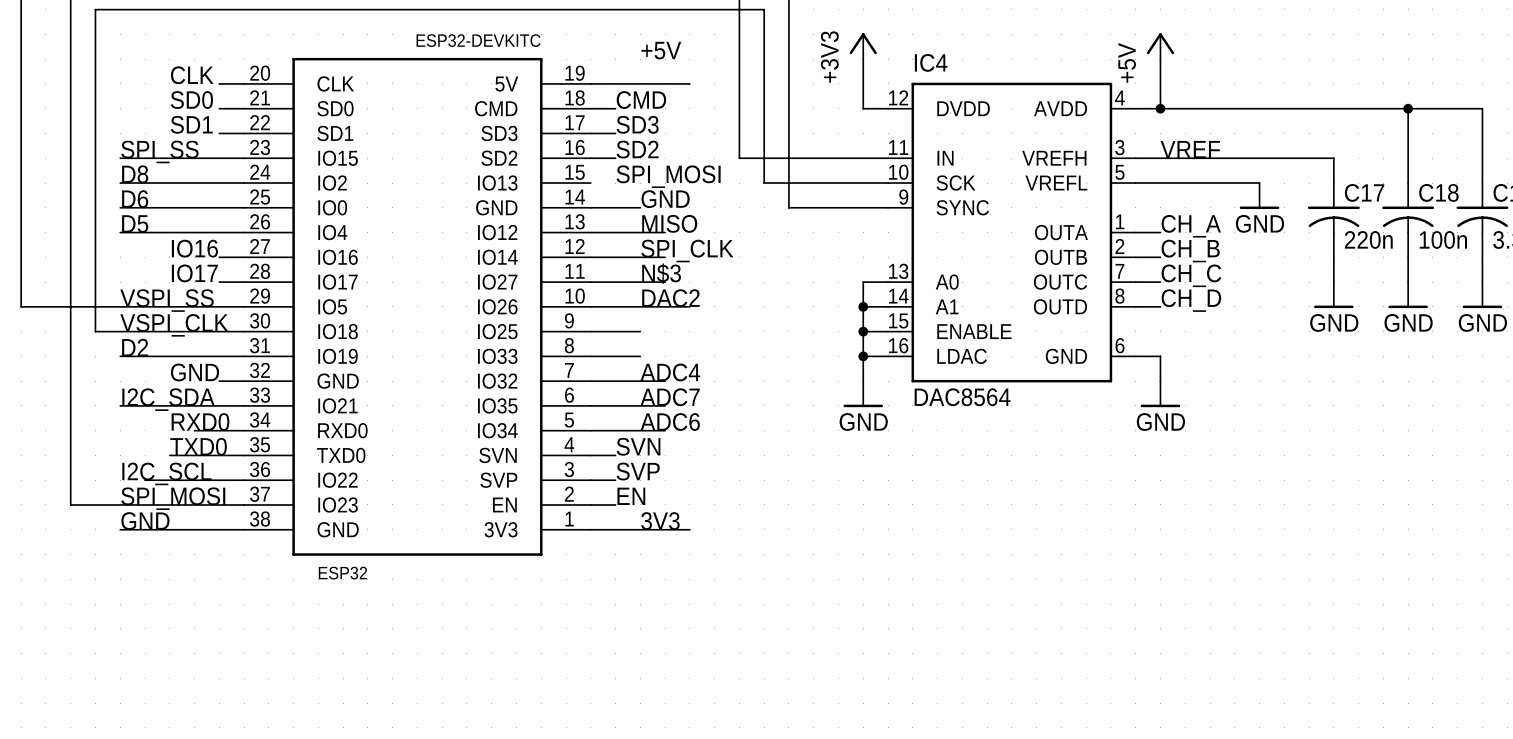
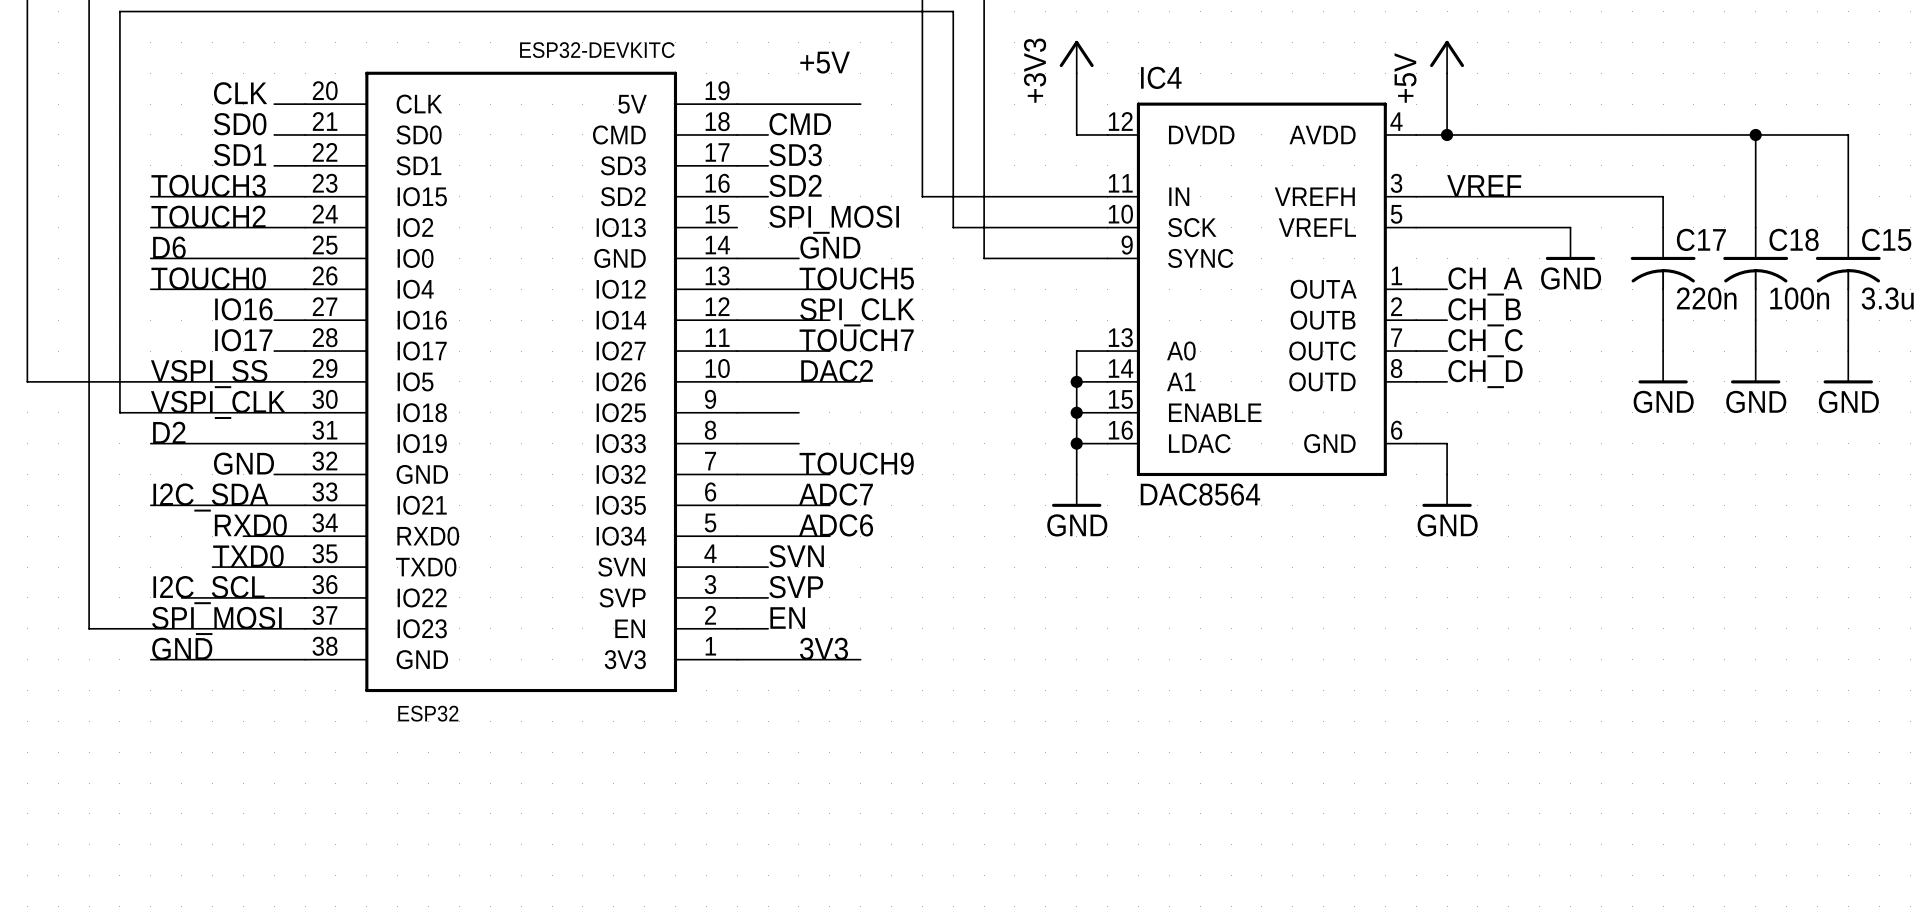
label: SPI_SS (159, 151) -> TOUCH3 (208, 185)
label: D8 (135, 174) -> TOUCH2 (208, 216)
label: MISO (669, 223) -> TOUCH5 (856, 278)
label: D5 (135, 224) -> TOUCH0 (208, 278)
label: N$3 (661, 273) -> TOUCH7 (856, 340)
label: ADC4 (670, 372) -> TOUCH9 (856, 463)

